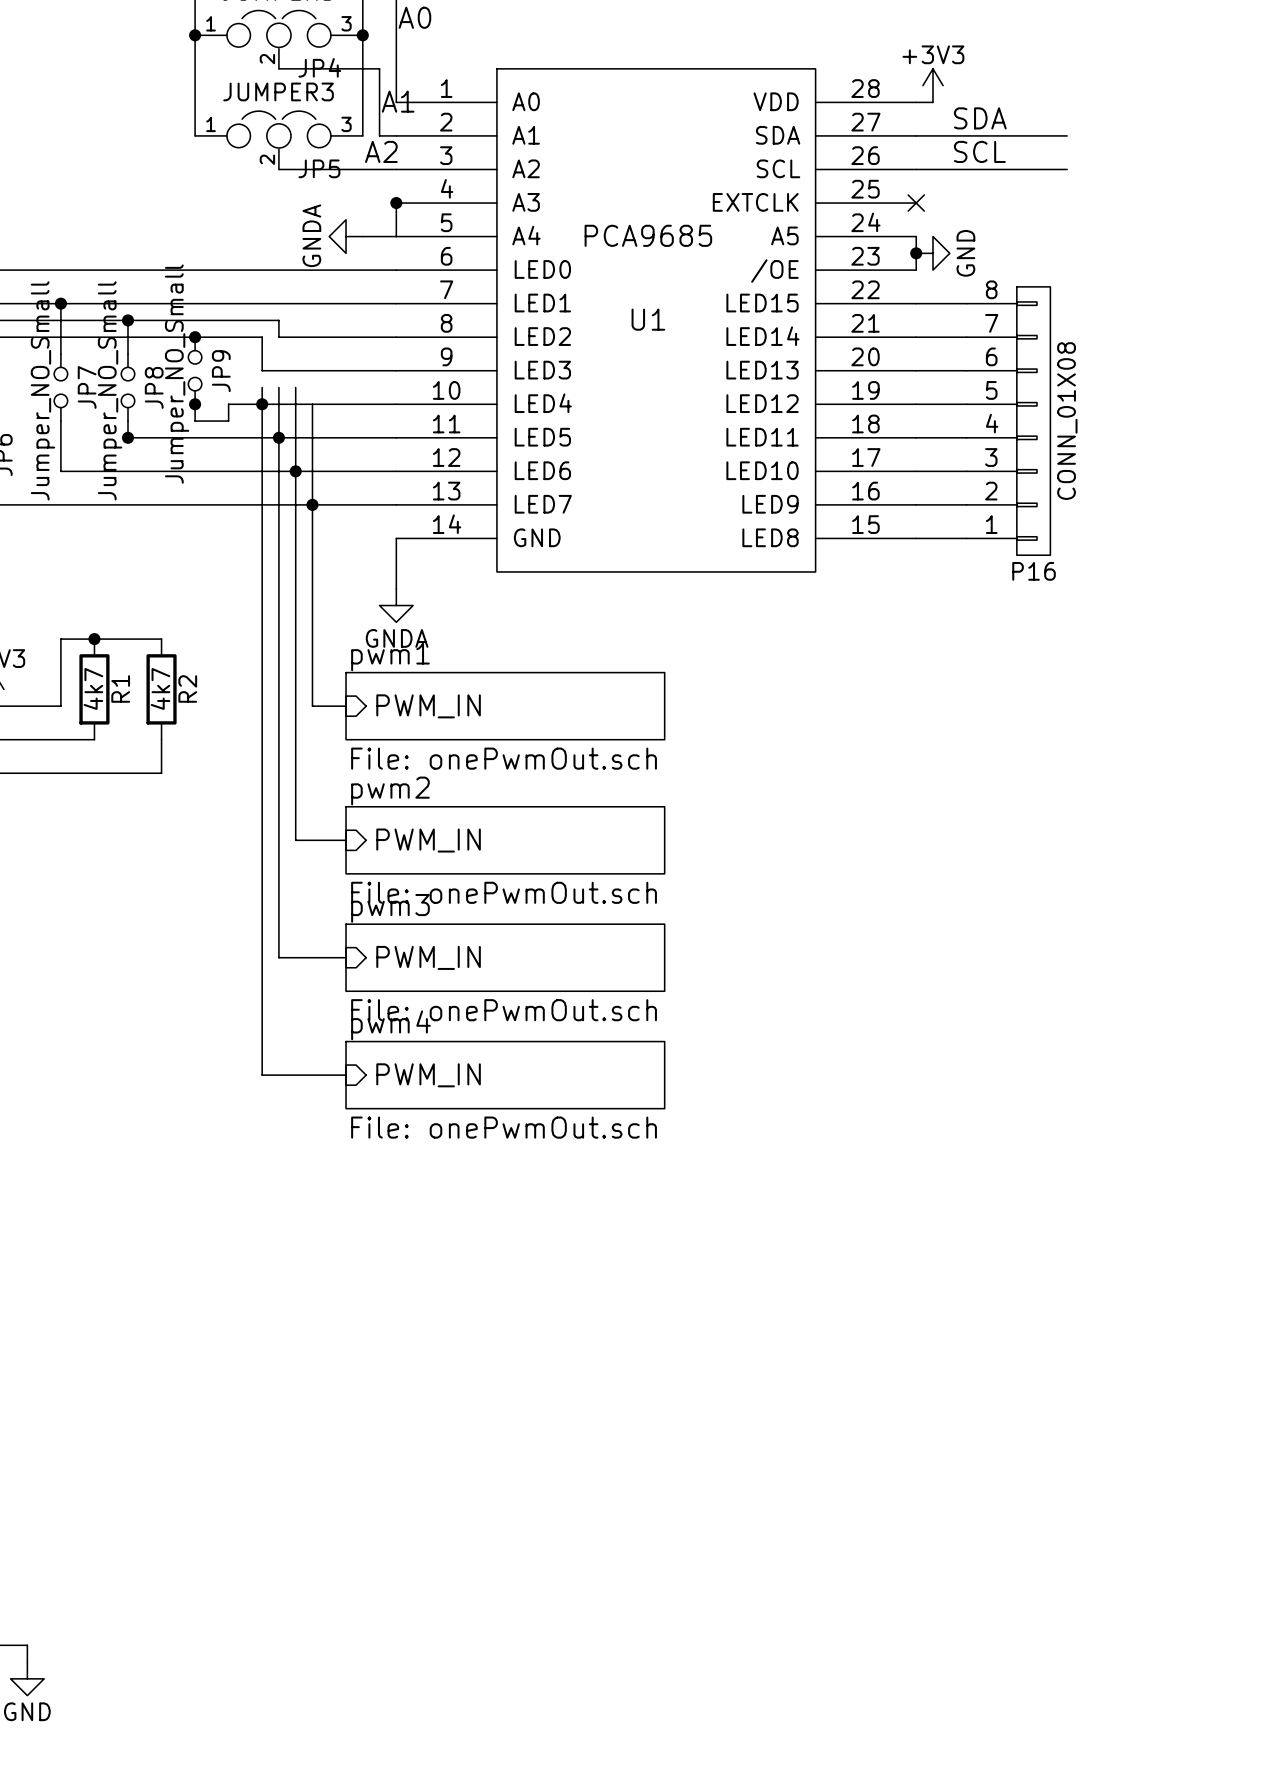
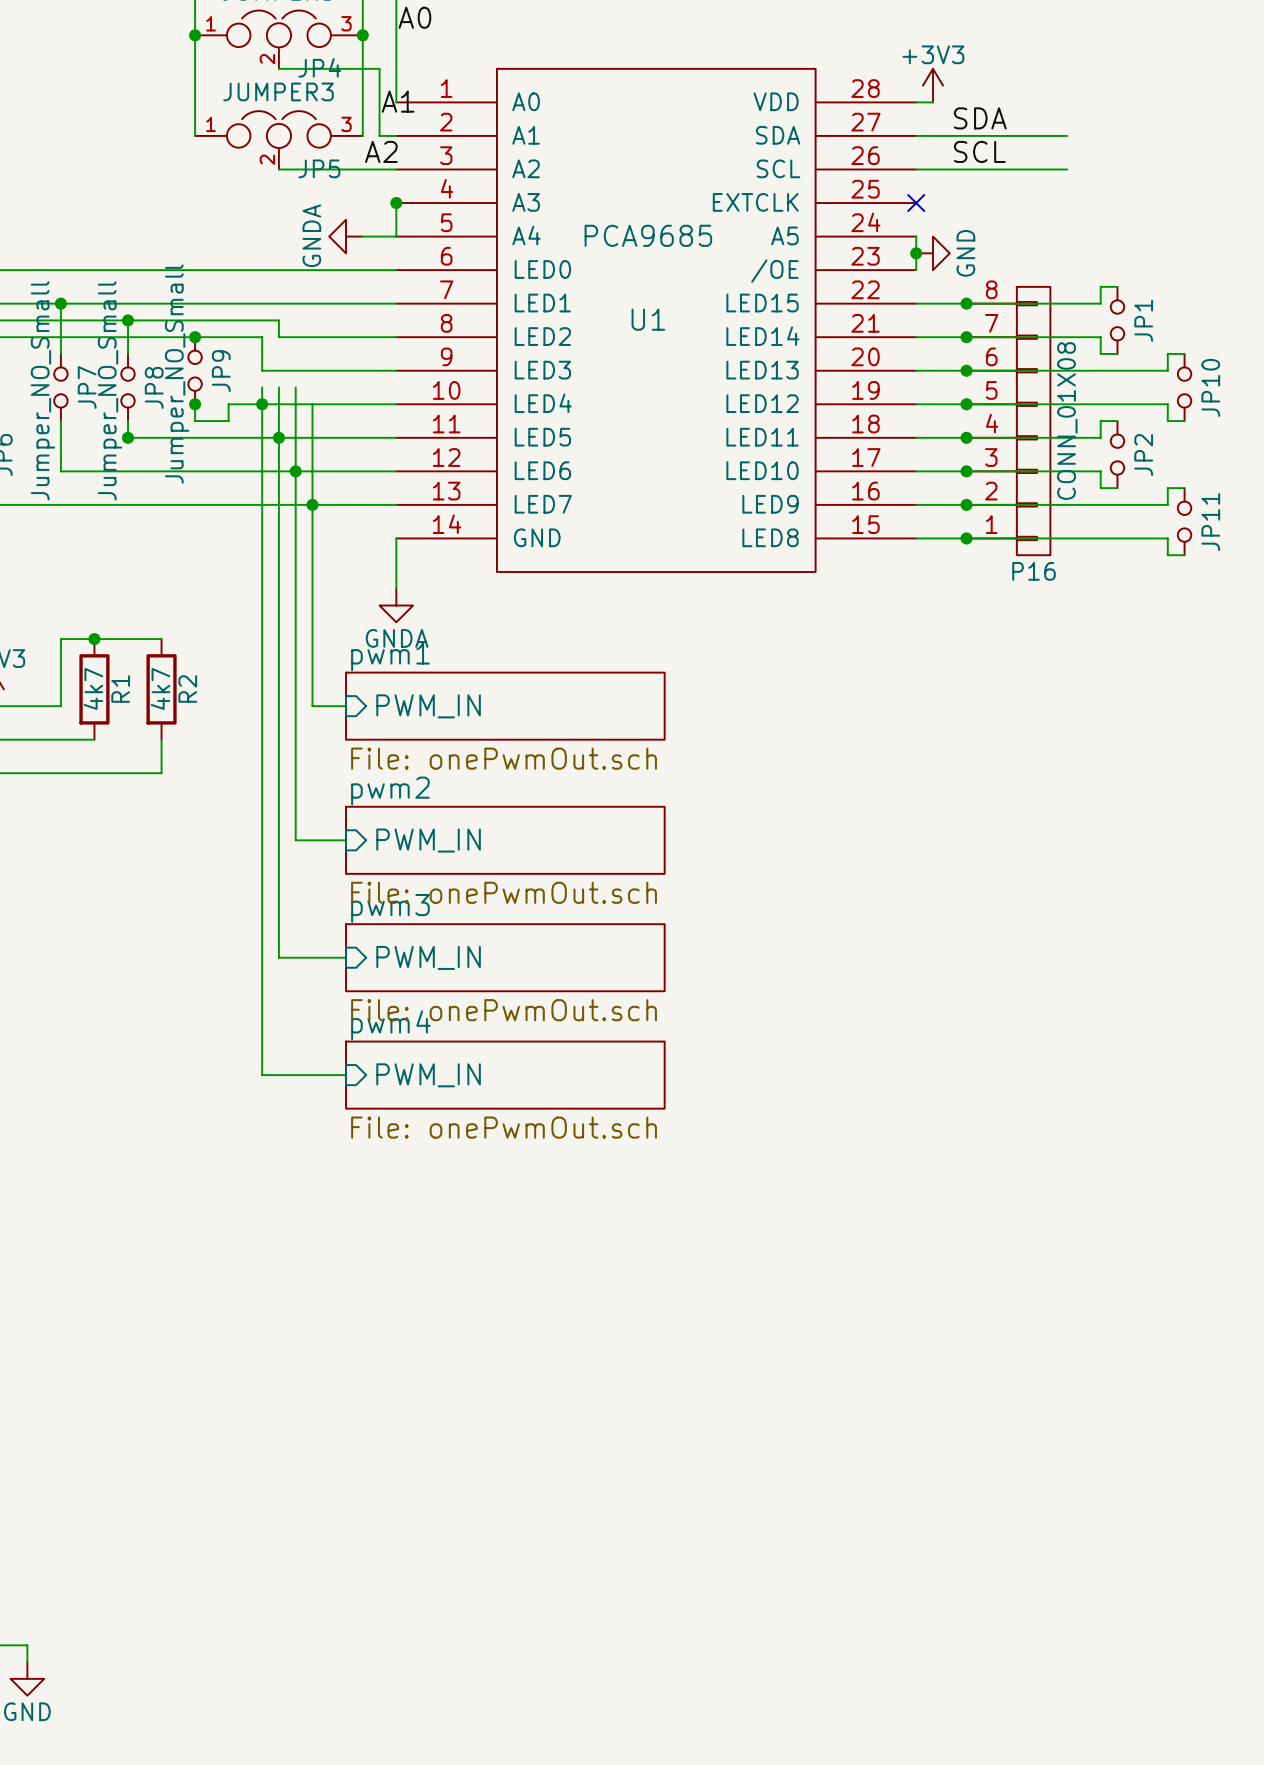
wire: none -> (1117, 286) (1100, 286) (1100, 303) (966, 303)
junction: none -> (966, 303)
JP1: none -> (1117, 320)
wire: none -> (966, 337) (1100, 337) (1100, 353) (1117, 353)
junction: none -> (966, 337)
wire: none -> (1184, 353) (1167, 353) (1167, 370) (966, 370)
junction: none -> (966, 370)
JP10: none -> (1184, 387)
wire: none -> (966, 404) (1167, 404) (1167, 421) (1184, 421)
junction: none -> (966, 404)
wire: none -> (1117, 421) (1100, 421) (1100, 437) (966, 437)
junction: none -> (966, 437)
JP2: none -> (1117, 454)
wire: none -> (966, 471) (1100, 471) (1100, 488) (1117, 488)
junction: none -> (966, 471)
wire: none -> (1184, 488) (1167, 488) (1167, 504) (966, 504)
junction: none -> (966, 504)
JP11: none -> (1184, 521)
wire: none -> (966, 538) (1167, 538) (1167, 555) (1184, 555)
junction: none -> (966, 538)

